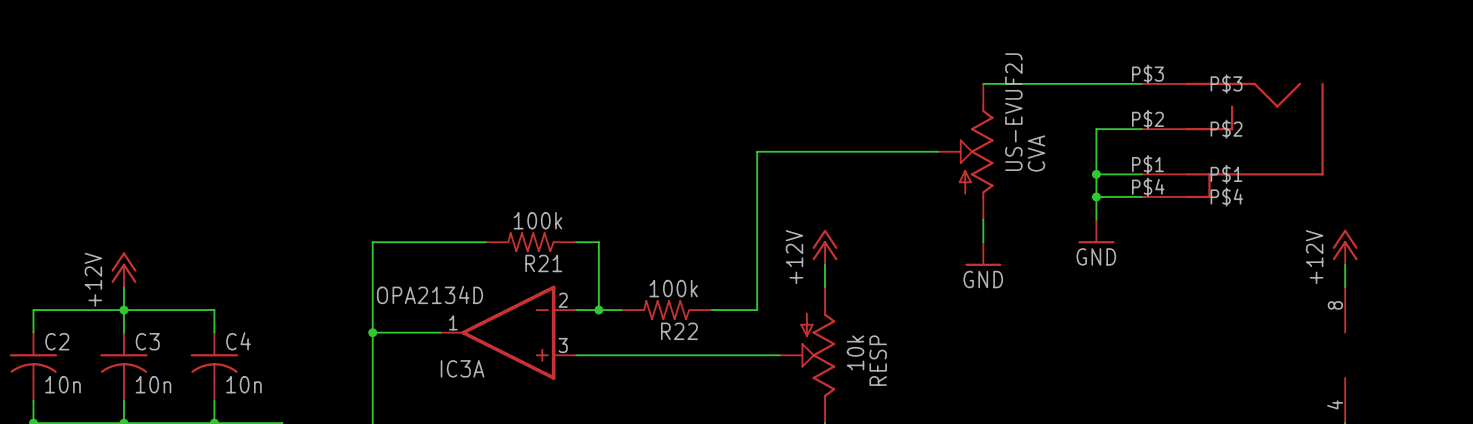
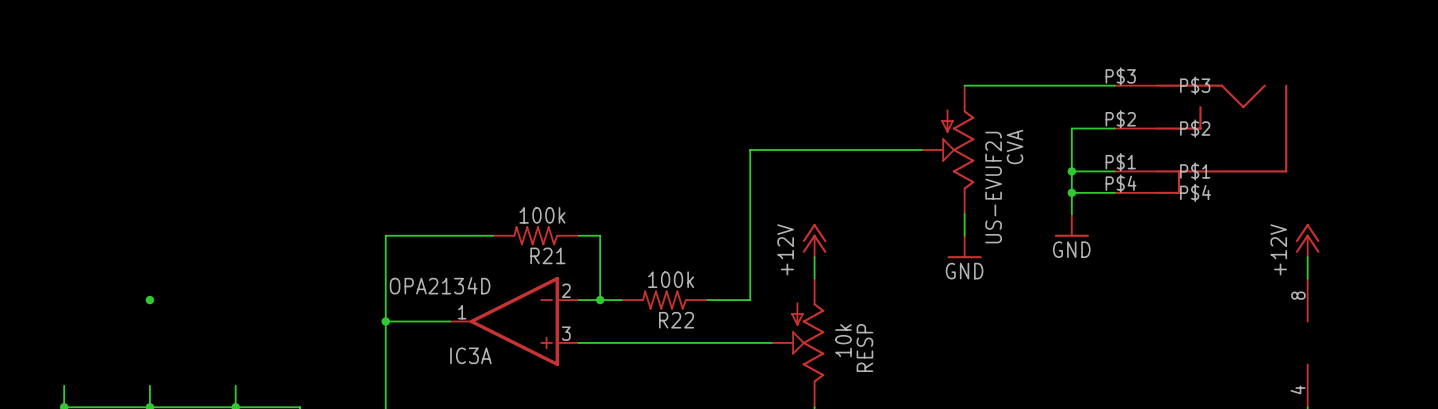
CVA flip: as is (976, 151) -> up-down (957, 149)
power symbol: +12V (123, 269) -> none
wire: (123, 287) (123, 332) -> none
wire: (33, 332) (33, 310) (214, 310) (214, 332) -> none
C2: 10n (33, 366) -> none
C3: 10n (123, 366) -> none
C4: 10n (214, 366) -> none

